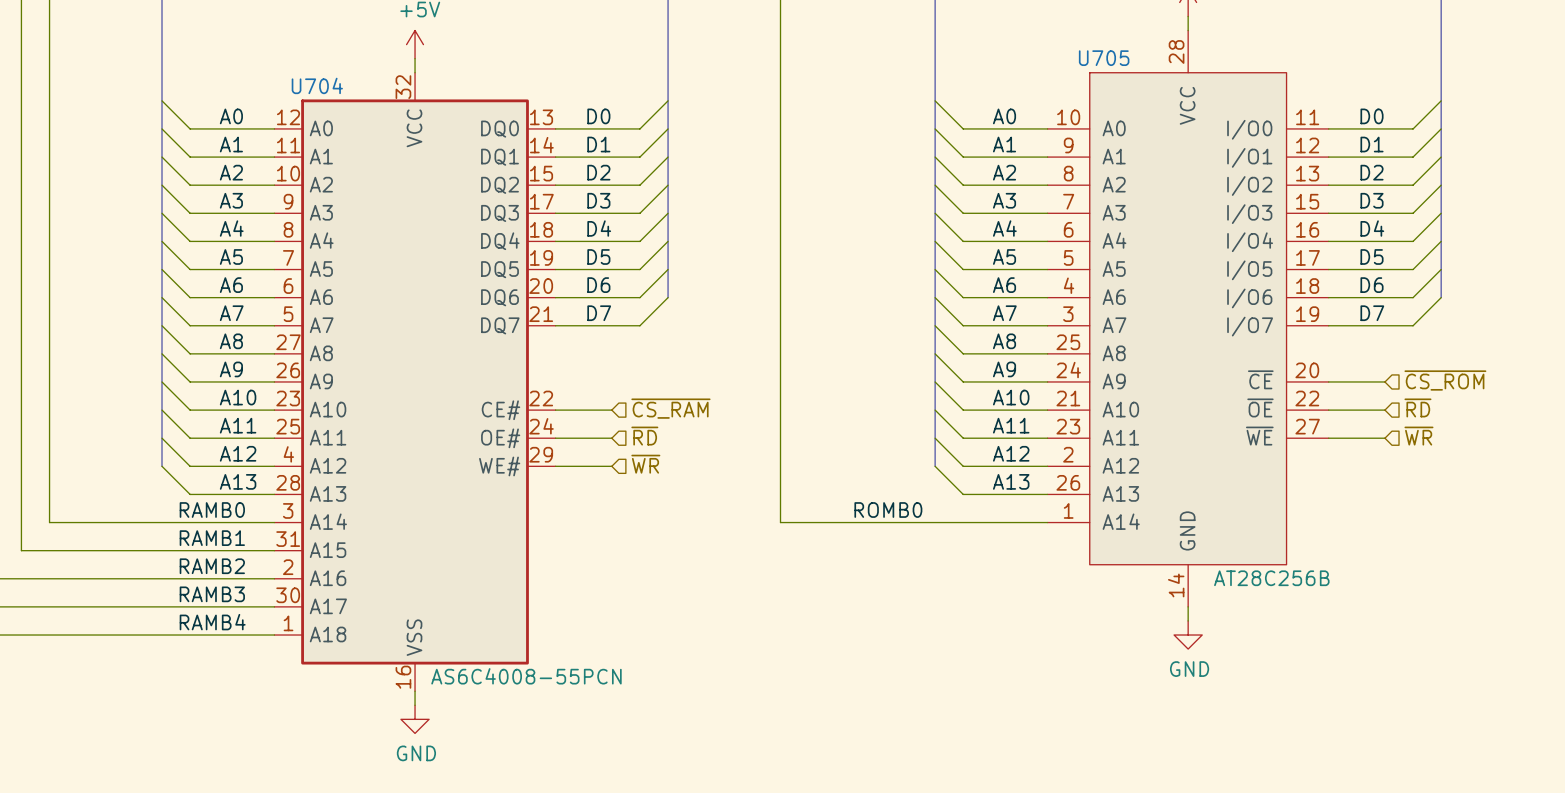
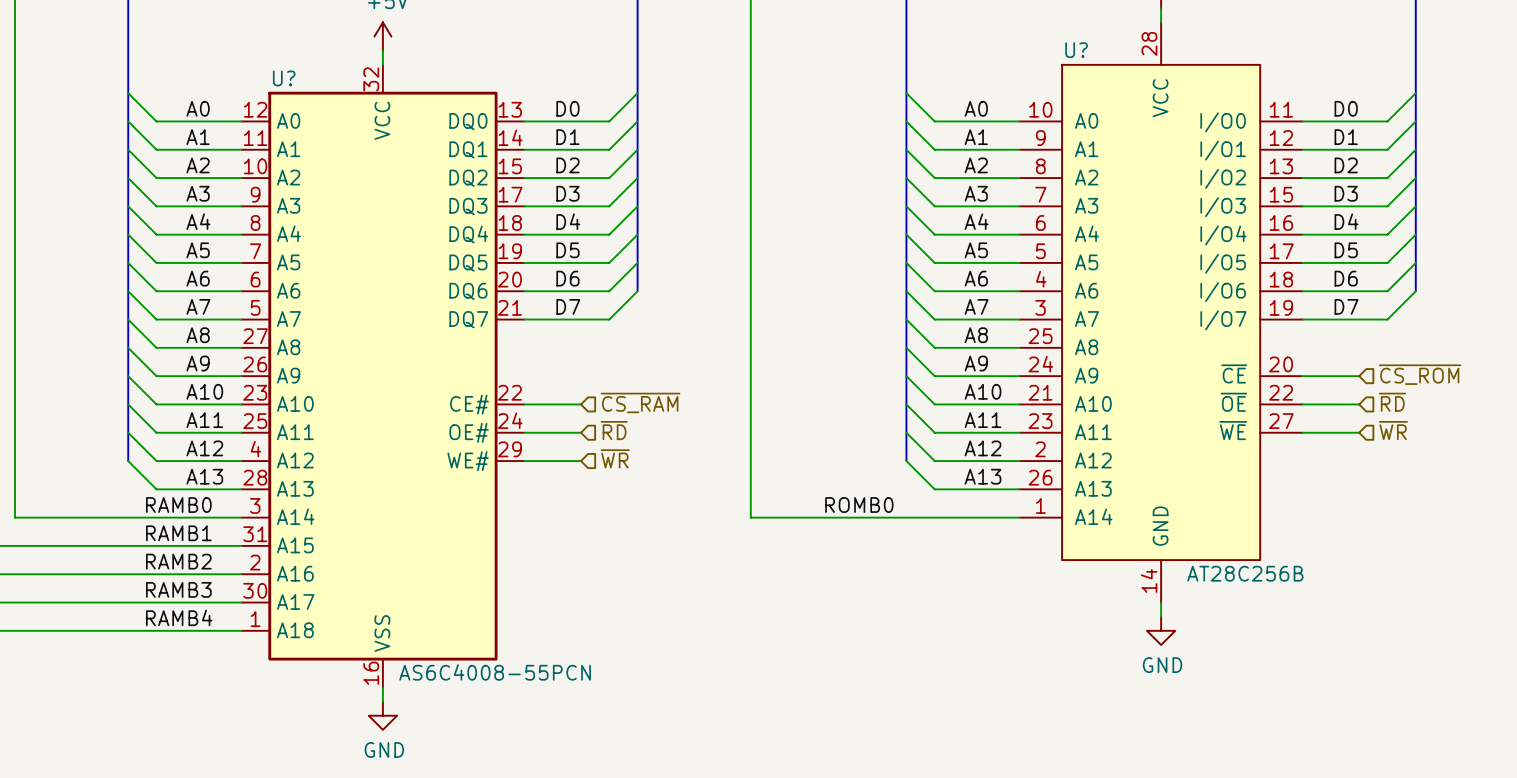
U705 name: U705 (1104, 58) -> U? (1076, 50)
U704 name: U704 (317, 85) -> U? (284, 78)

